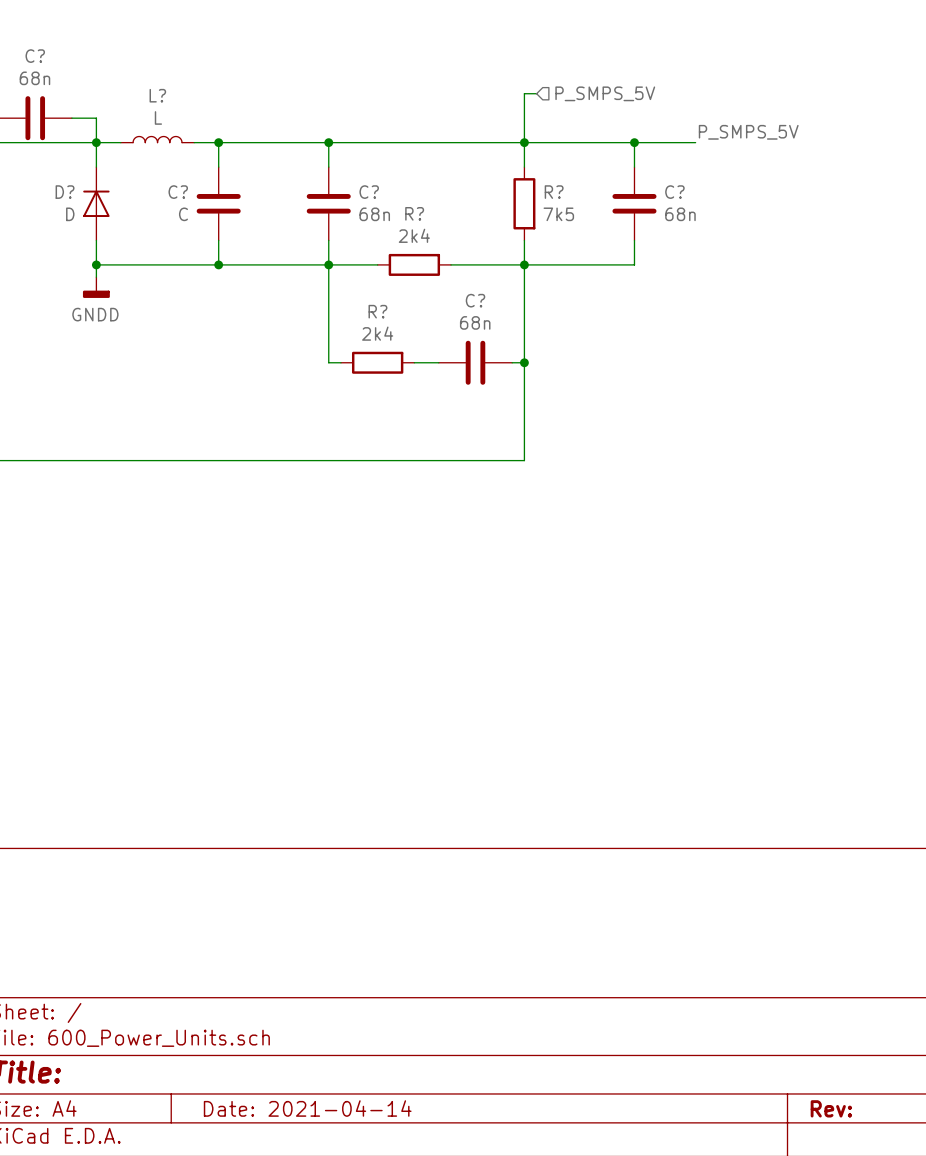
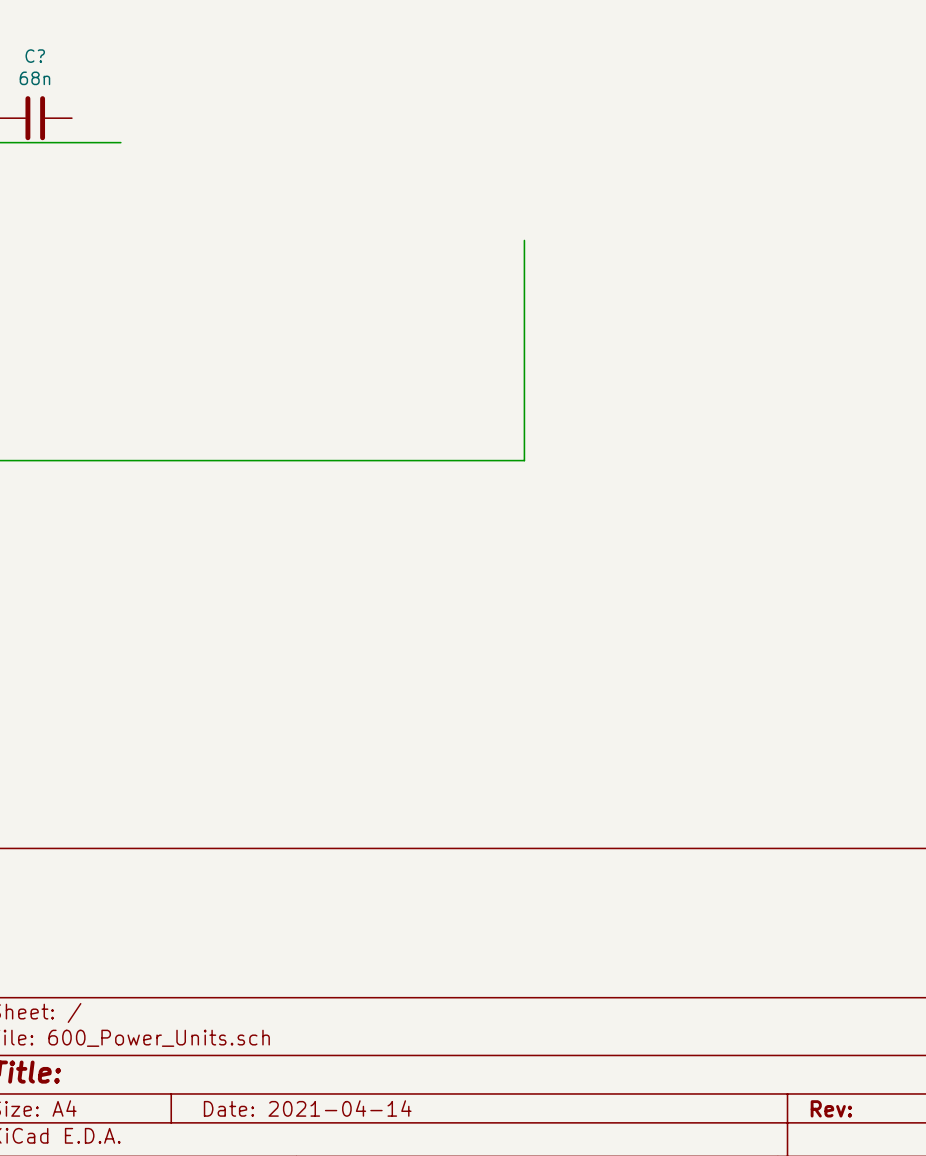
wire: (536, 93) (524, 93) (524, 167) -> none
hierarchical label: P_SMPS_5V (605, 93) -> none
wire: (71, 118) (96, 118) (96, 167) -> none
label: P_SMPS_5V (748, 132) -> none
L?: L (157, 139) -> none
junction: (96, 142) -> none
wire: (194, 142) (695, 142) -> none
wire: (218, 142) (218, 167) -> none
junction: (218, 142) -> none
wire: (328, 142) (328, 167) -> none
junction: (328, 142) -> none
junction: (524, 142) -> none
wire: (634, 142) (634, 167) -> none
junction: (634, 142) -> none
D?: D (96, 203) -> none
C?: C (218, 203) -> none
C?: 68n (328, 203) -> none
R?: 7k5 (524, 203) -> none
C?: 68n (634, 203) -> none
wire: (96, 240) (96, 277) -> none
wire: (218, 240) (218, 264) -> none
wire: (328, 240) (328, 362) (340, 362) -> none
wire: (634, 240) (634, 264) (451, 264) -> none
wire: (96, 264) (377, 264) -> none
junction: (96, 264) -> none
junction: (218, 264) -> none
junction: (328, 264) -> none
R?: 2k4 (414, 264) -> none
junction: (524, 264) -> none
power symbol: GNDD (96, 287) -> none
R?: 2k4 (377, 362) -> none
wire: (414, 362) (438, 362) -> none
C?: 68n (475, 362) -> none
wire: (512, 362) (524, 362) -> none
junction: (524, 362) -> none

